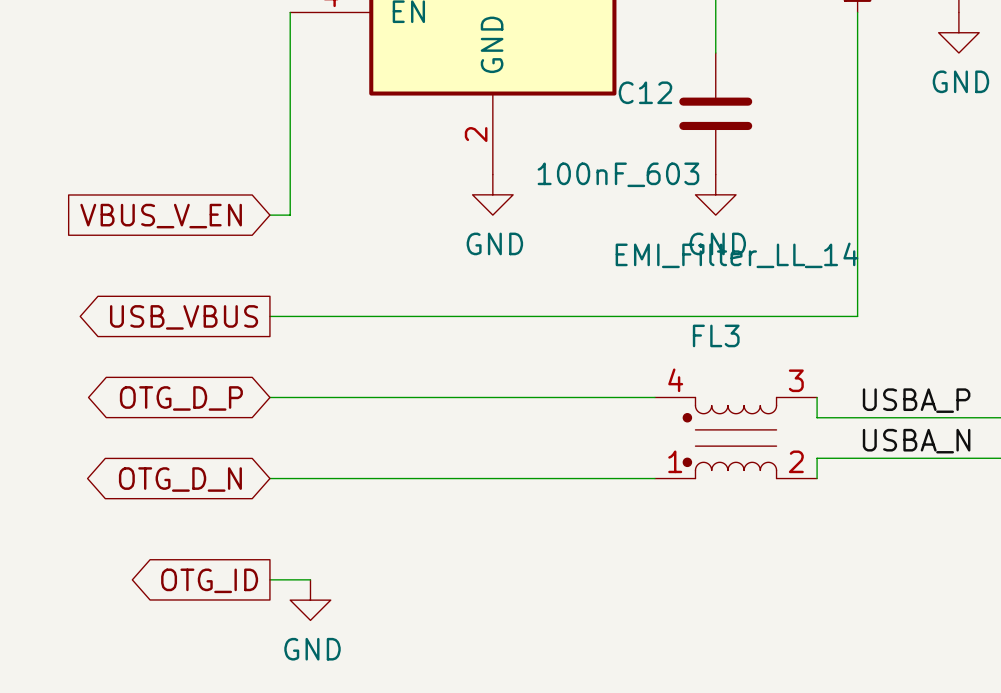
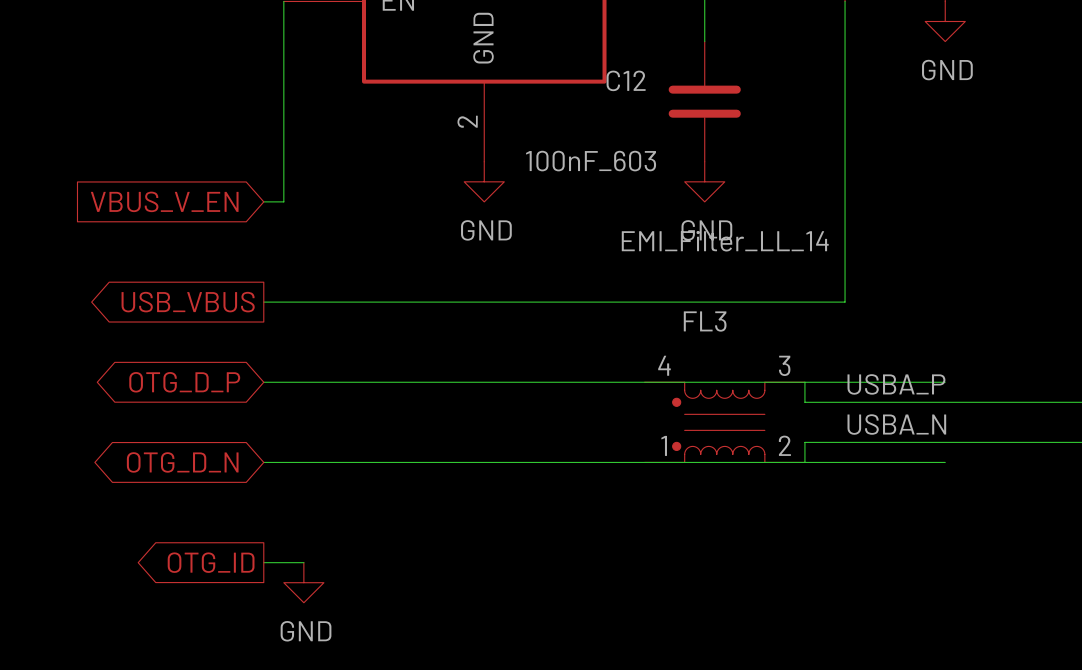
wire: none -> (644, 382) (945, 382)
wire: none -> (644, 462) (945, 462)

